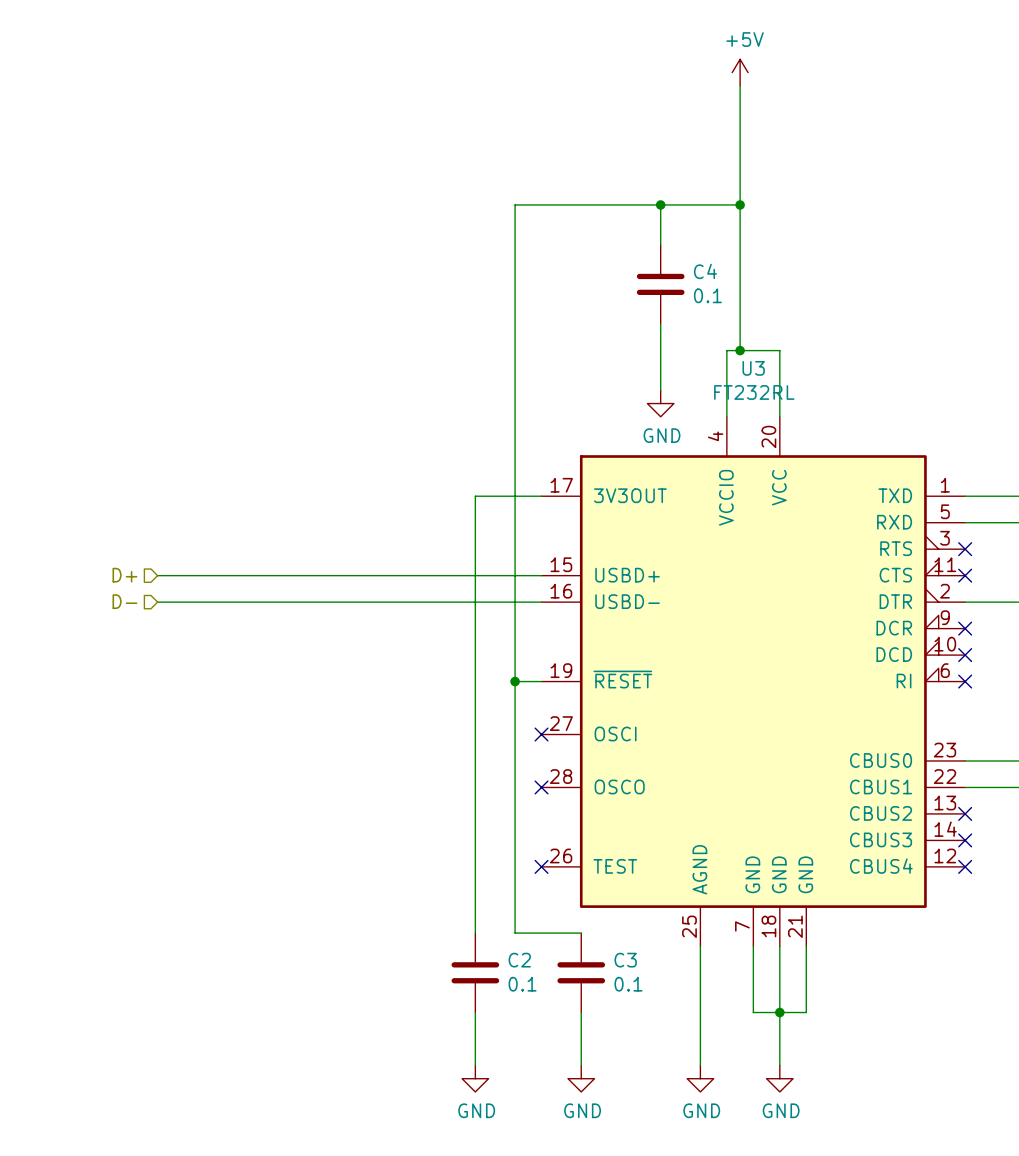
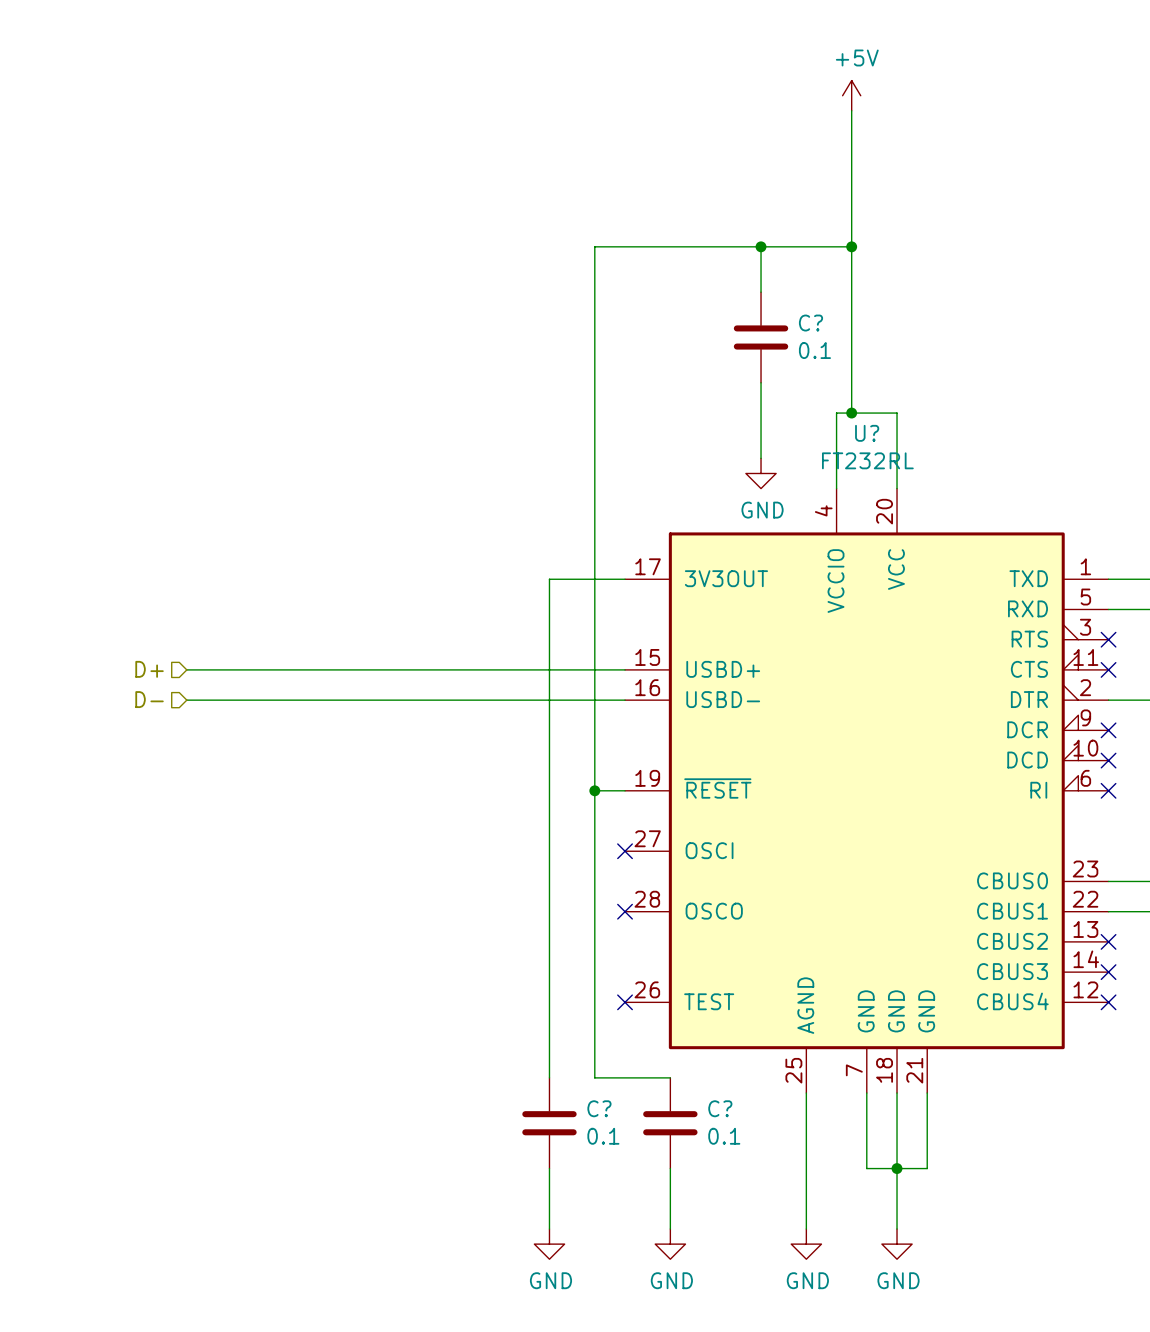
C4 name: C4 (705, 271) -> C? (810, 323)
U3 name: U3 (753, 368) -> U? (867, 433)
C2 name: C2 (519, 960) -> C? (599, 1108)
C3 name: C3 (625, 960) -> C? (720, 1108)

